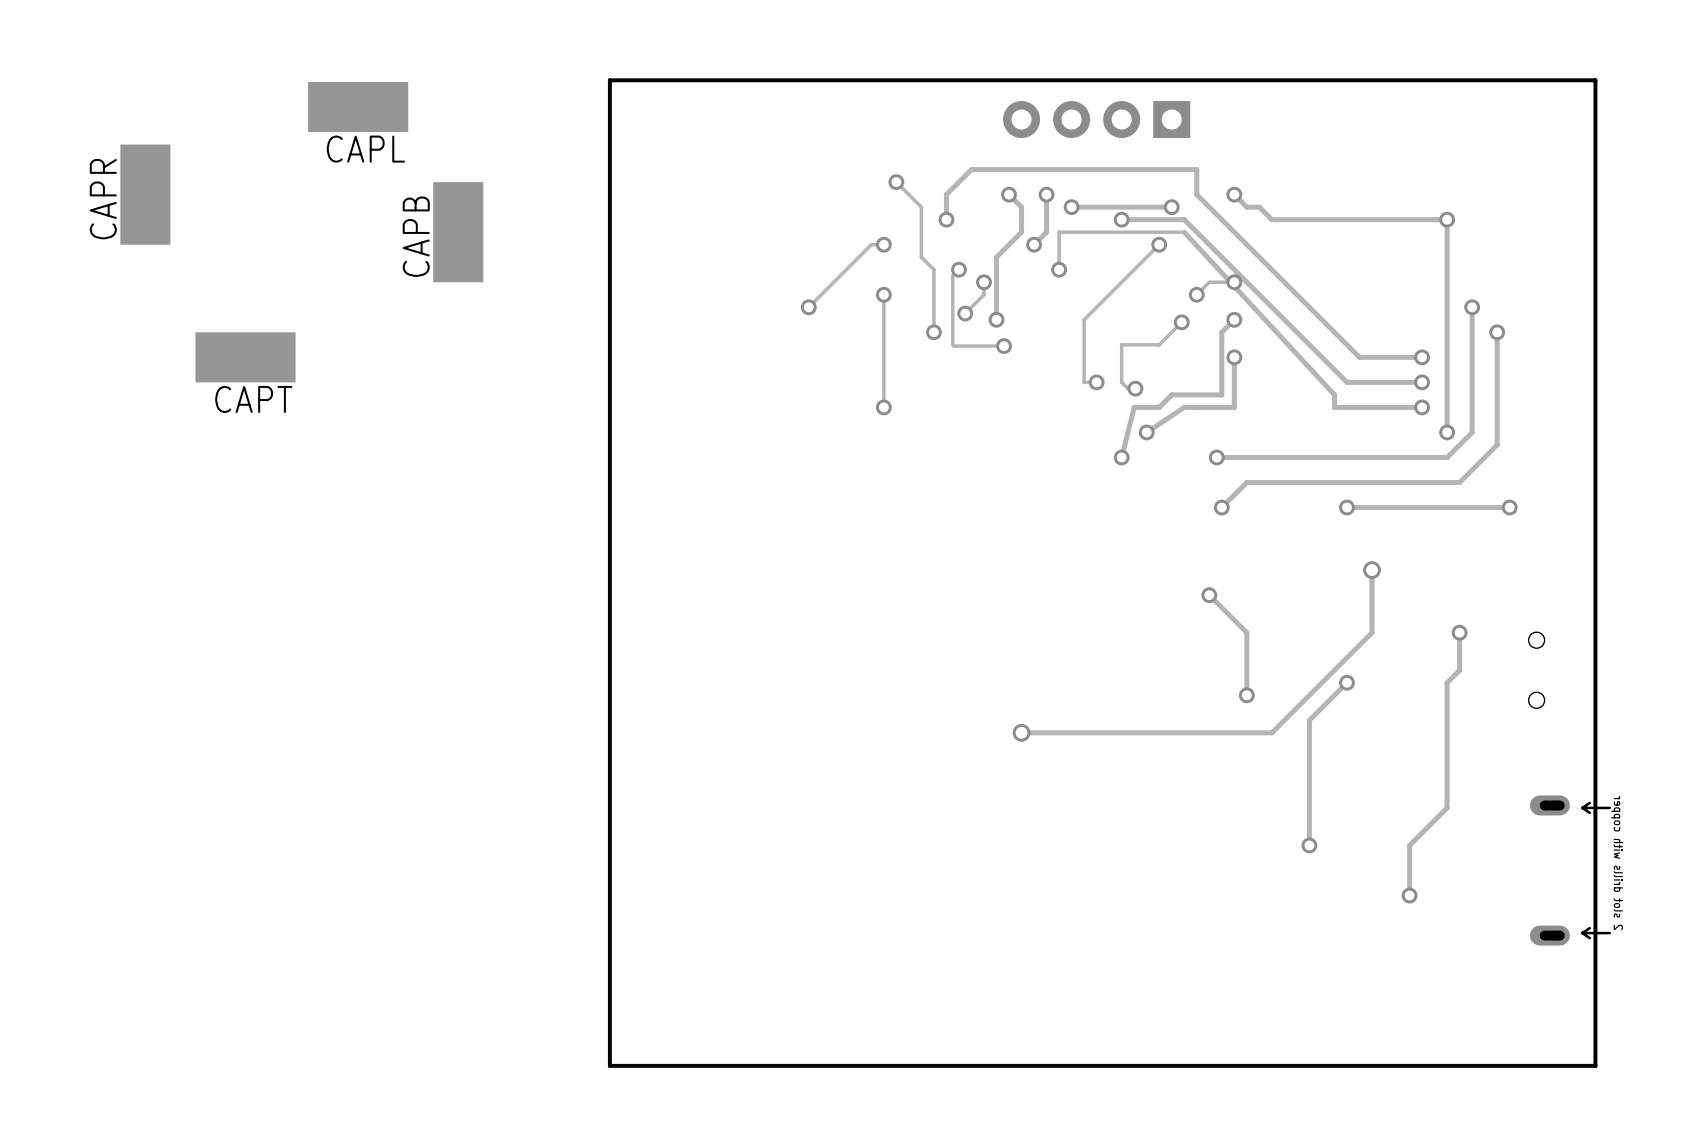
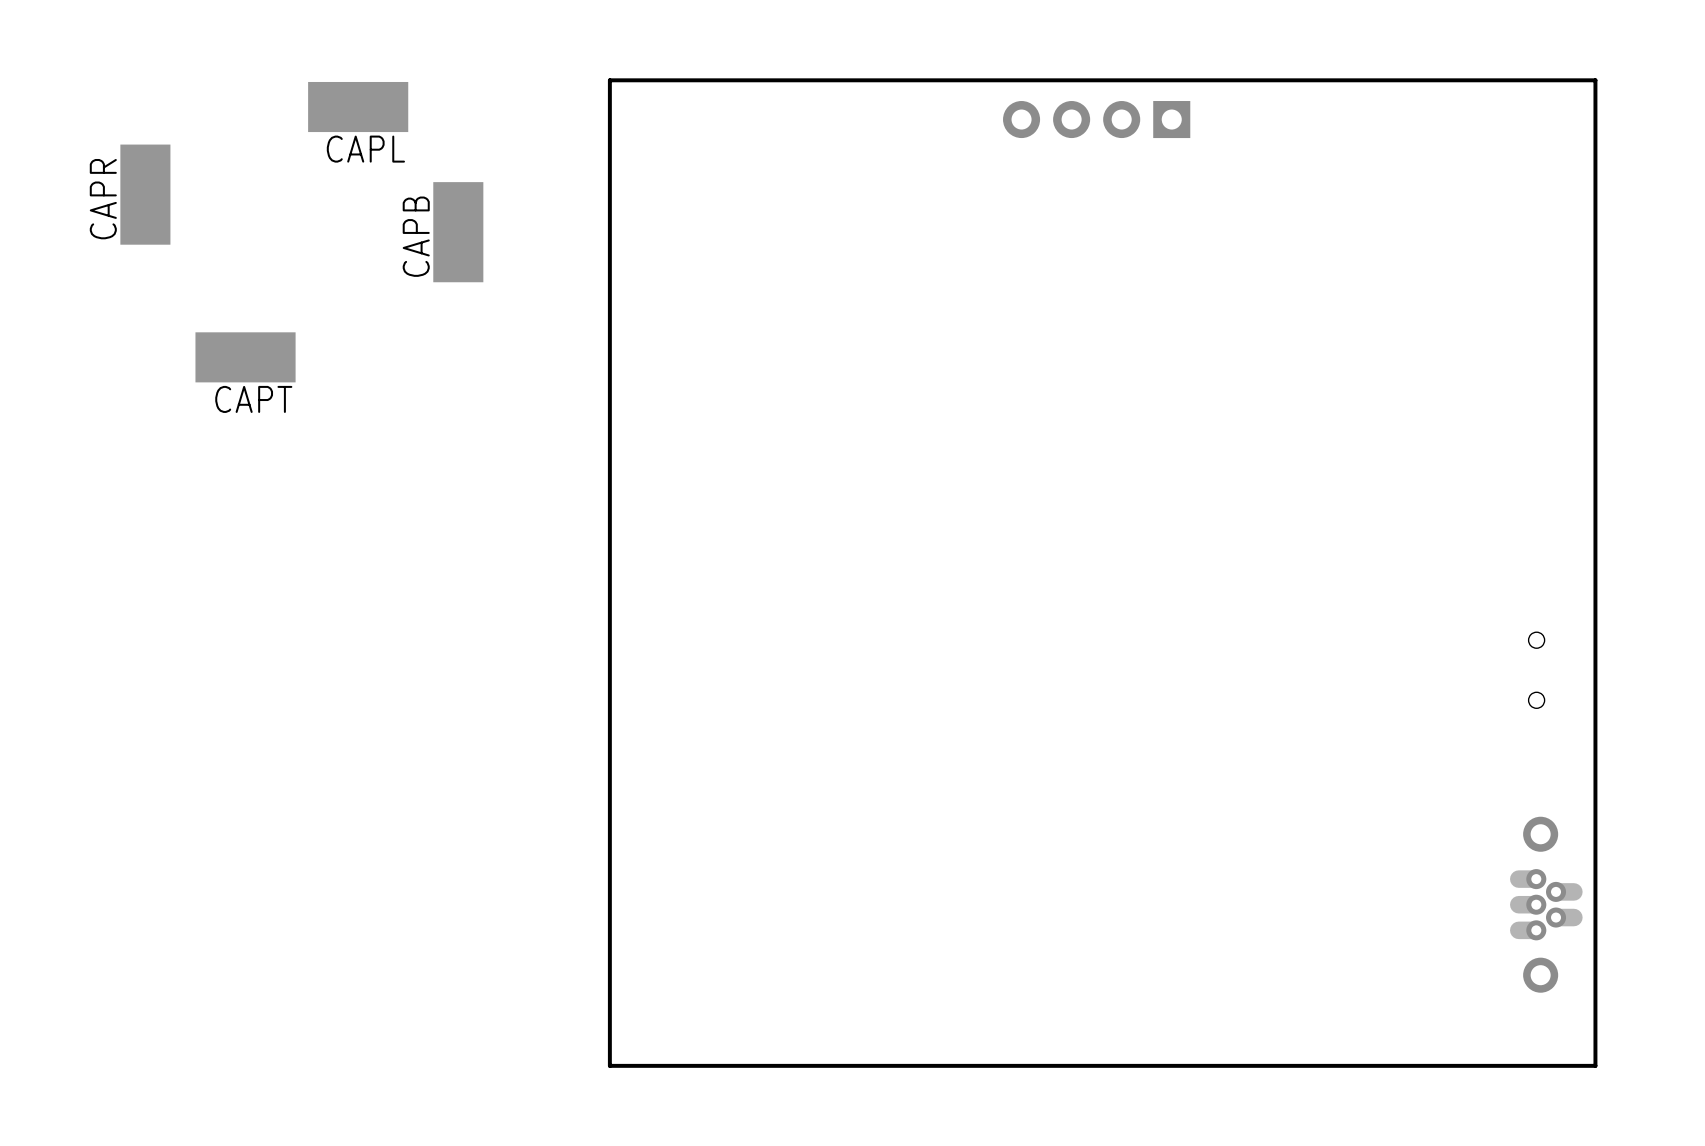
track: (896, 182) (921, 207) (921, 257) (933, 269) (933, 332) -> none
via: (896, 182) -> none
track: (1009, 194) (1021, 207) (1021, 232) (996, 257) (996, 319) -> none
via: (1009, 194) -> none
track: (1046, 194) (1046, 232) (1034, 244) -> none
via: (1046, 194) -> none
track: (1234, 194) (1246, 207) (1259, 207) (1271, 219) (1447, 219) (1447, 432) -> none
via: (1234, 194) -> none
via: (1071, 207) -> none
track: (1171, 207) (1071, 207) -> none
via: (1171, 207) -> none
track: (946, 219) (946, 194) (971, 169) (1196, 169) (1196, 194) (1359, 357) (1422, 357) -> none
via: (946, 219) -> none
track: (1121, 219) (1184, 219) (1346, 382) (1422, 382) -> none
via: (1121, 219) -> none
via: (1447, 219) -> none
track: (883, 244) (871, 244) (808, 307) -> none
via: (883, 244) -> none
via: (1034, 244) -> none
track: (1159, 244) (1084, 319) (1084, 382) (1096, 382) -> none
via: (1159, 244) -> none
track: (958, 269) (952, 275) (952, 344) (1004, 346) -> none
via: (958, 269) -> none
track: (1059, 269) (1059, 232) (1184, 232) (1334, 394) (1334, 407) (1422, 407) -> none
via: (1059, 269) -> none
track: (984, 282) (984, 294) (965, 313) -> none
via: (984, 282) -> none
track: (1234, 282) (1209, 282) (1196, 294) -> none
via: (1234, 282) -> none
track: (883, 294) (883, 407) -> none
via: (883, 294) -> none
via: (1196, 294) -> none
via: (808, 307) -> none
track: (1472, 307) (1472, 432) (1447, 457) (1216, 457) -> none
via: (1472, 307) -> none
via: (965, 313) -> none
via: (996, 319) -> none
track: (1234, 319) (1221, 332) (1221, 394) (1171, 394) (1159, 407) (1134, 407) (1121, 457) -> none
via: (1234, 319) -> none
track: (1181, 322) (1159, 344) (1121, 344) (1121, 382) (1127, 388) (1135, 388) -> none
via: (1181, 322) -> none
via: (933, 332) -> none
track: (1497, 332) (1497, 444) (1459, 482) (1246, 482) (1221, 507) -> none
via: (1497, 332) -> none
via: (1004, 346) -> none
track: (1234, 357) (1234, 407) (1184, 407) (1146, 432) -> none
via: (1234, 357) -> none
via: (1422, 357) -> none
via: (1096, 382) -> none
via: (1422, 382) -> none
via: (1135, 388) -> none
via: (883, 407) -> none
via: (1422, 407) -> none
via: (1146, 432) -> none
via: (1447, 432) -> none
via: (1121, 457) -> none
via: (1216, 457) -> none
via: (1221, 507) -> none
via: (1346, 507) -> none
track: (1509, 507) (1346, 507) -> none
via: (1509, 507) -> none
track: (1372, 570) (1372, 632) (1271, 732) (1021, 732) -> none
via: (1372, 570) -> none
track: (1209, 595) (1246, 632) (1246, 695) -> none
via: (1209, 595) -> none
track: (1459, 632) (1459, 670) (1447, 682) (1447, 807) (1409, 845) (1409, 895) -> none
via: (1459, 632) -> none
track: (1346, 682) (1309, 720) (1309, 845) -> none
via: (1346, 682) -> none
via: (1246, 695) -> none
via: (1021, 732) -> none
via: (1309, 845) -> none
part: (1570, 870) -> none
via: (1409, 895) -> none
part: none -> (1546, 904)

